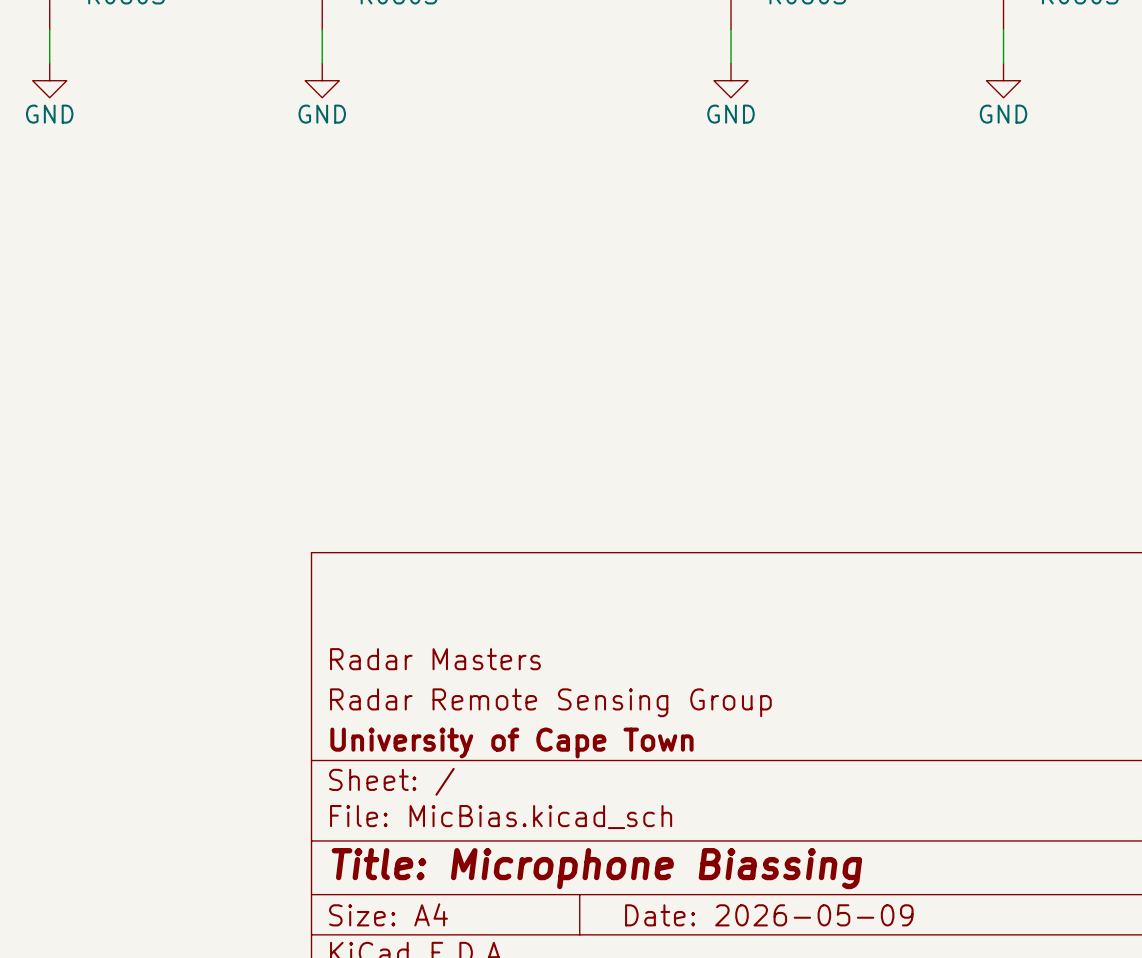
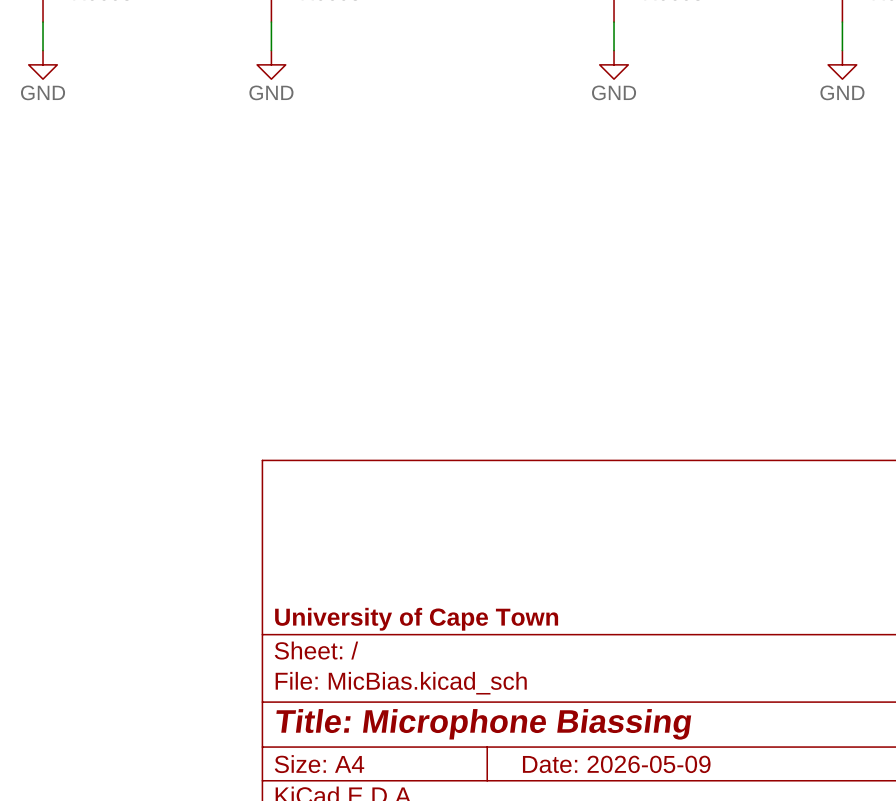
title block: Radar Masters (435, 659) -> none
title block: Radar Remote Sensing Group (550, 702) -> none

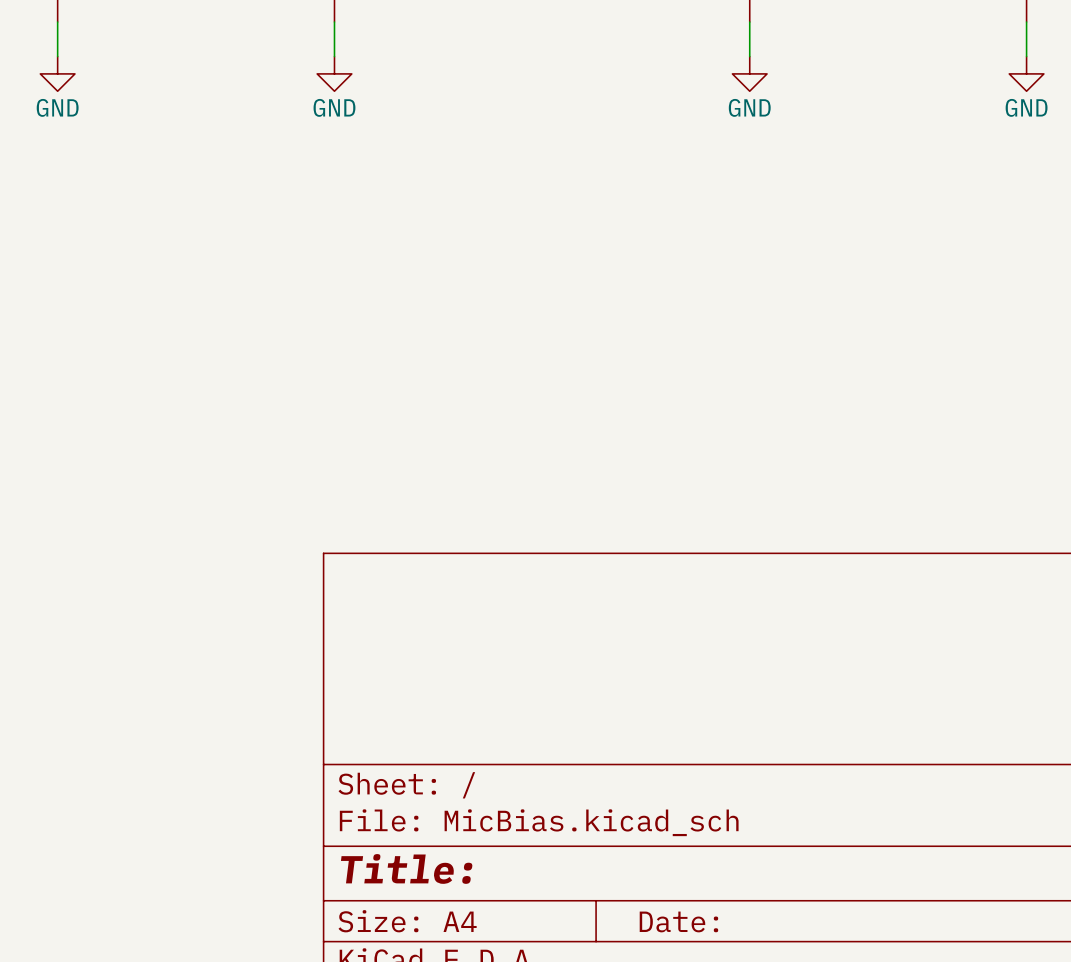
title block: University of Cape Town (416, 619) -> none
title block: Title: Microphone Biassing (483, 724) -> Title: (406, 868)
title block: Date: 2026-05-09 (616, 764) -> Date: (678, 921)

